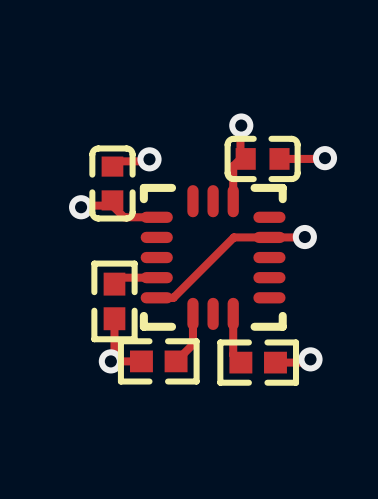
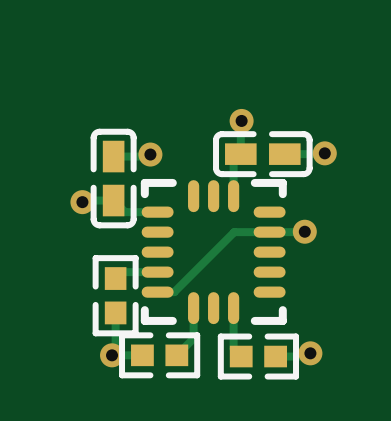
part footprint: [224, 135, 301, 183] -> [213, 131, 313, 178]
part footprint: [89, 145, 136, 222] -> [90, 128, 137, 229]

